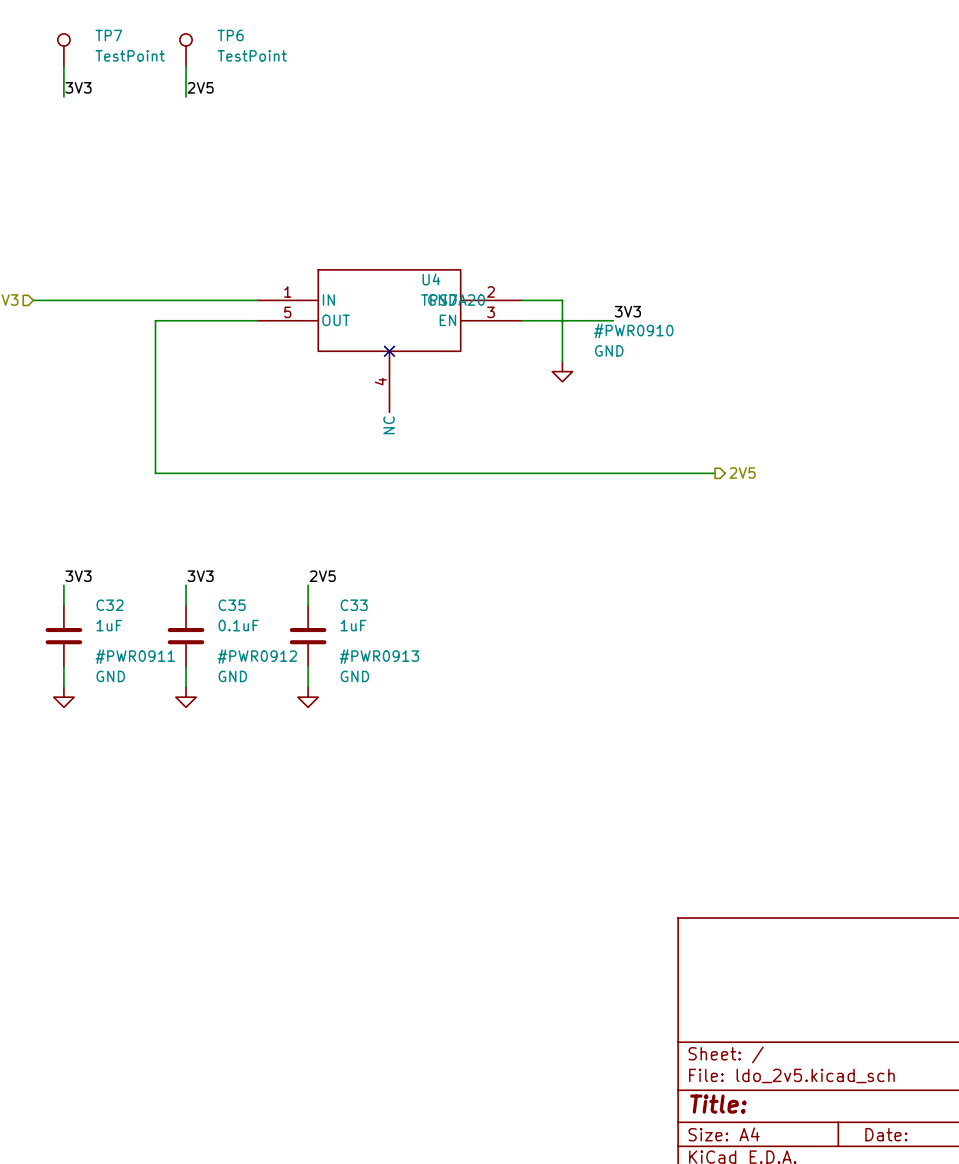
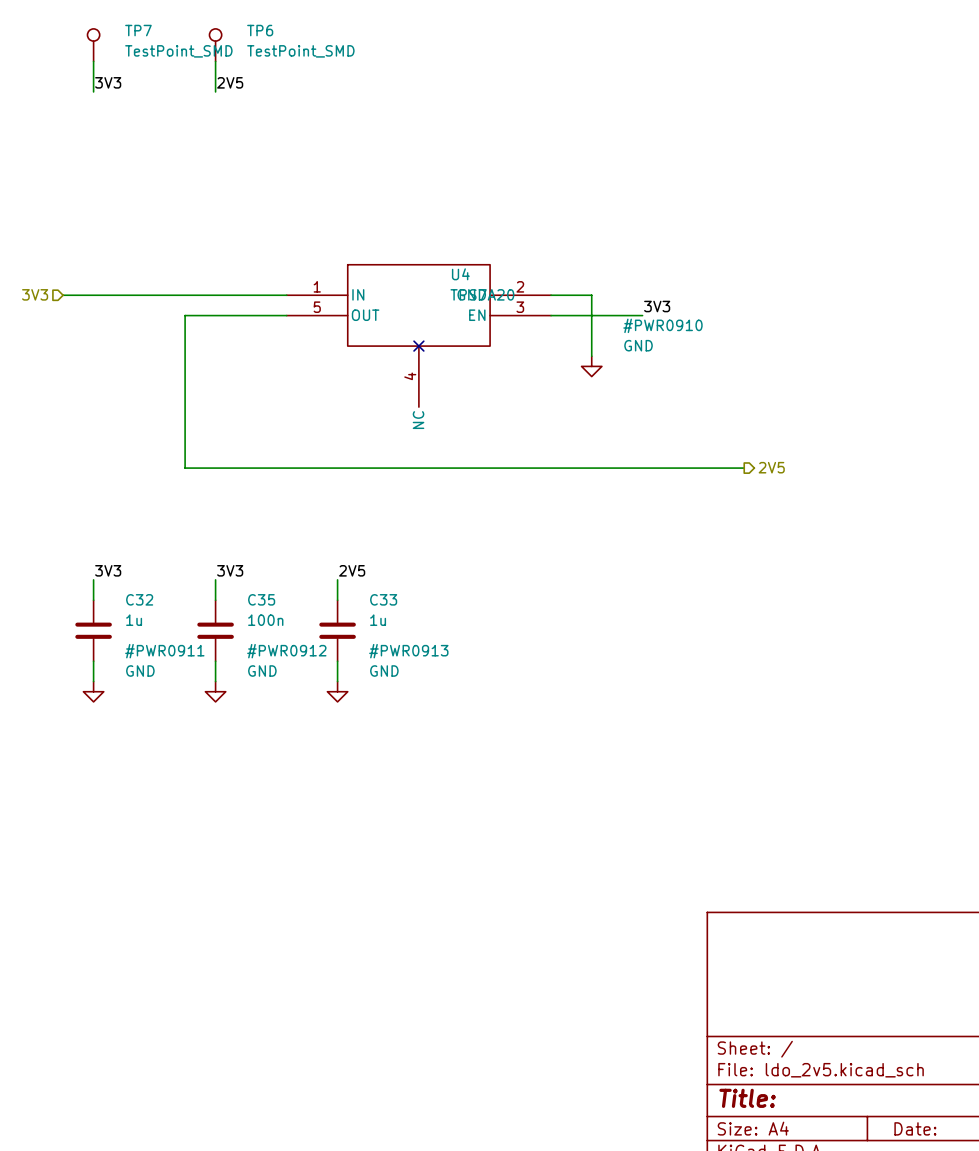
TP7 value: TestPoint (130, 55) -> TestPoint_SMD (178, 51)
TP6 value: TestPoint (252, 55) -> TestPoint_SMD (300, 51)
C32 value: 1uF (109, 625) -> 1u (134, 620)
C35 value: 0.1uF (238, 625) -> 100n (265, 620)
C33 value: 1uF (353, 625) -> 1u (378, 620)

